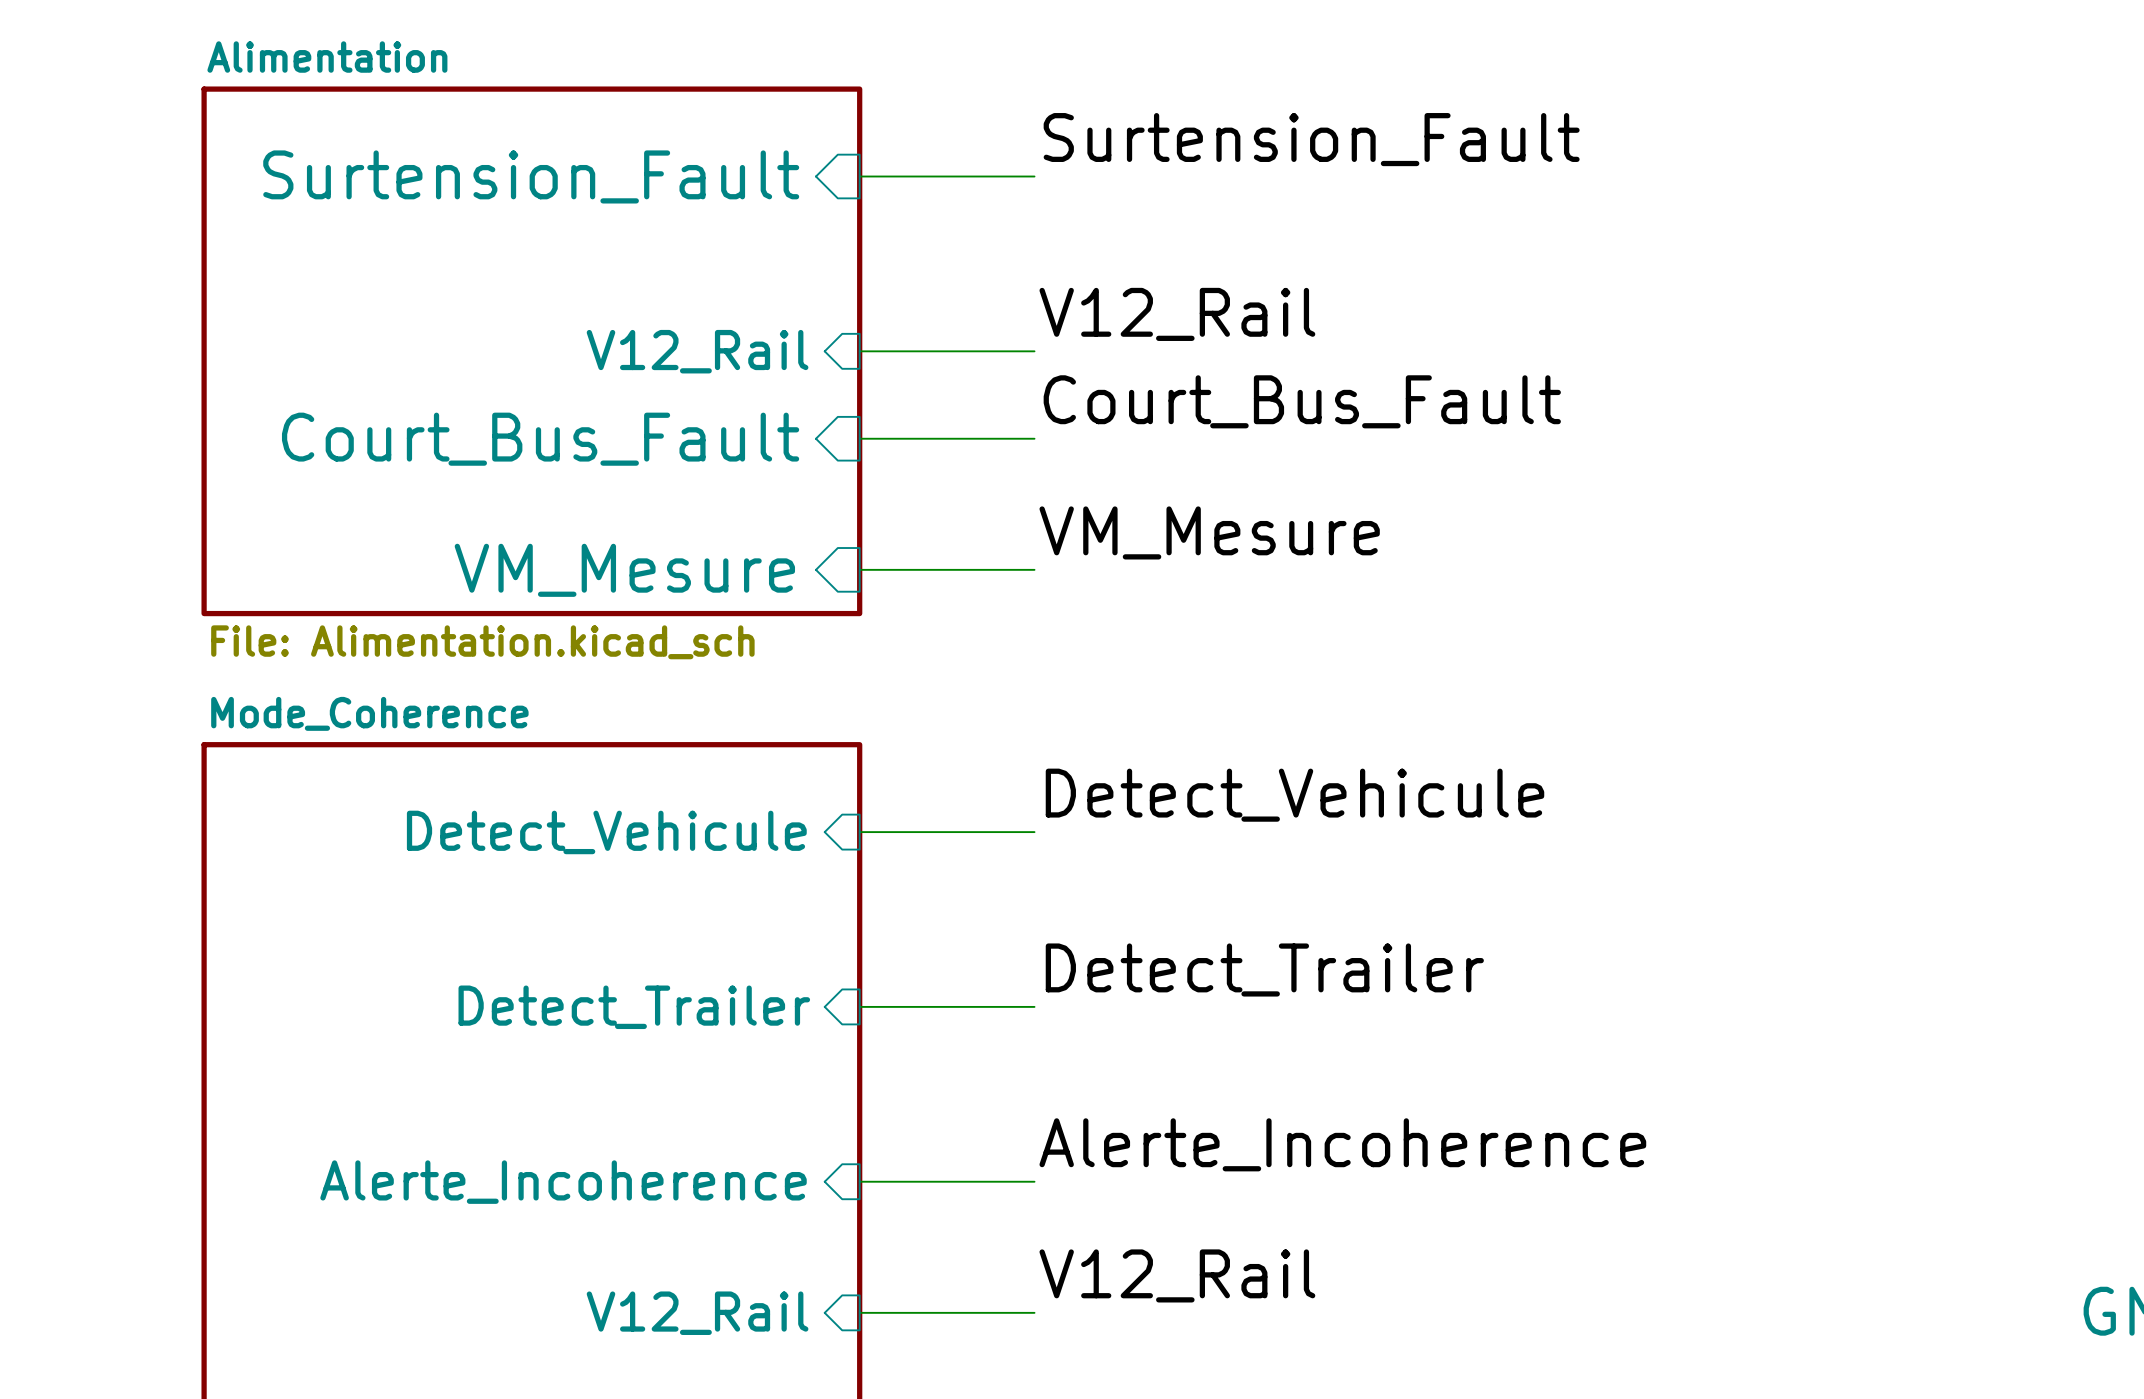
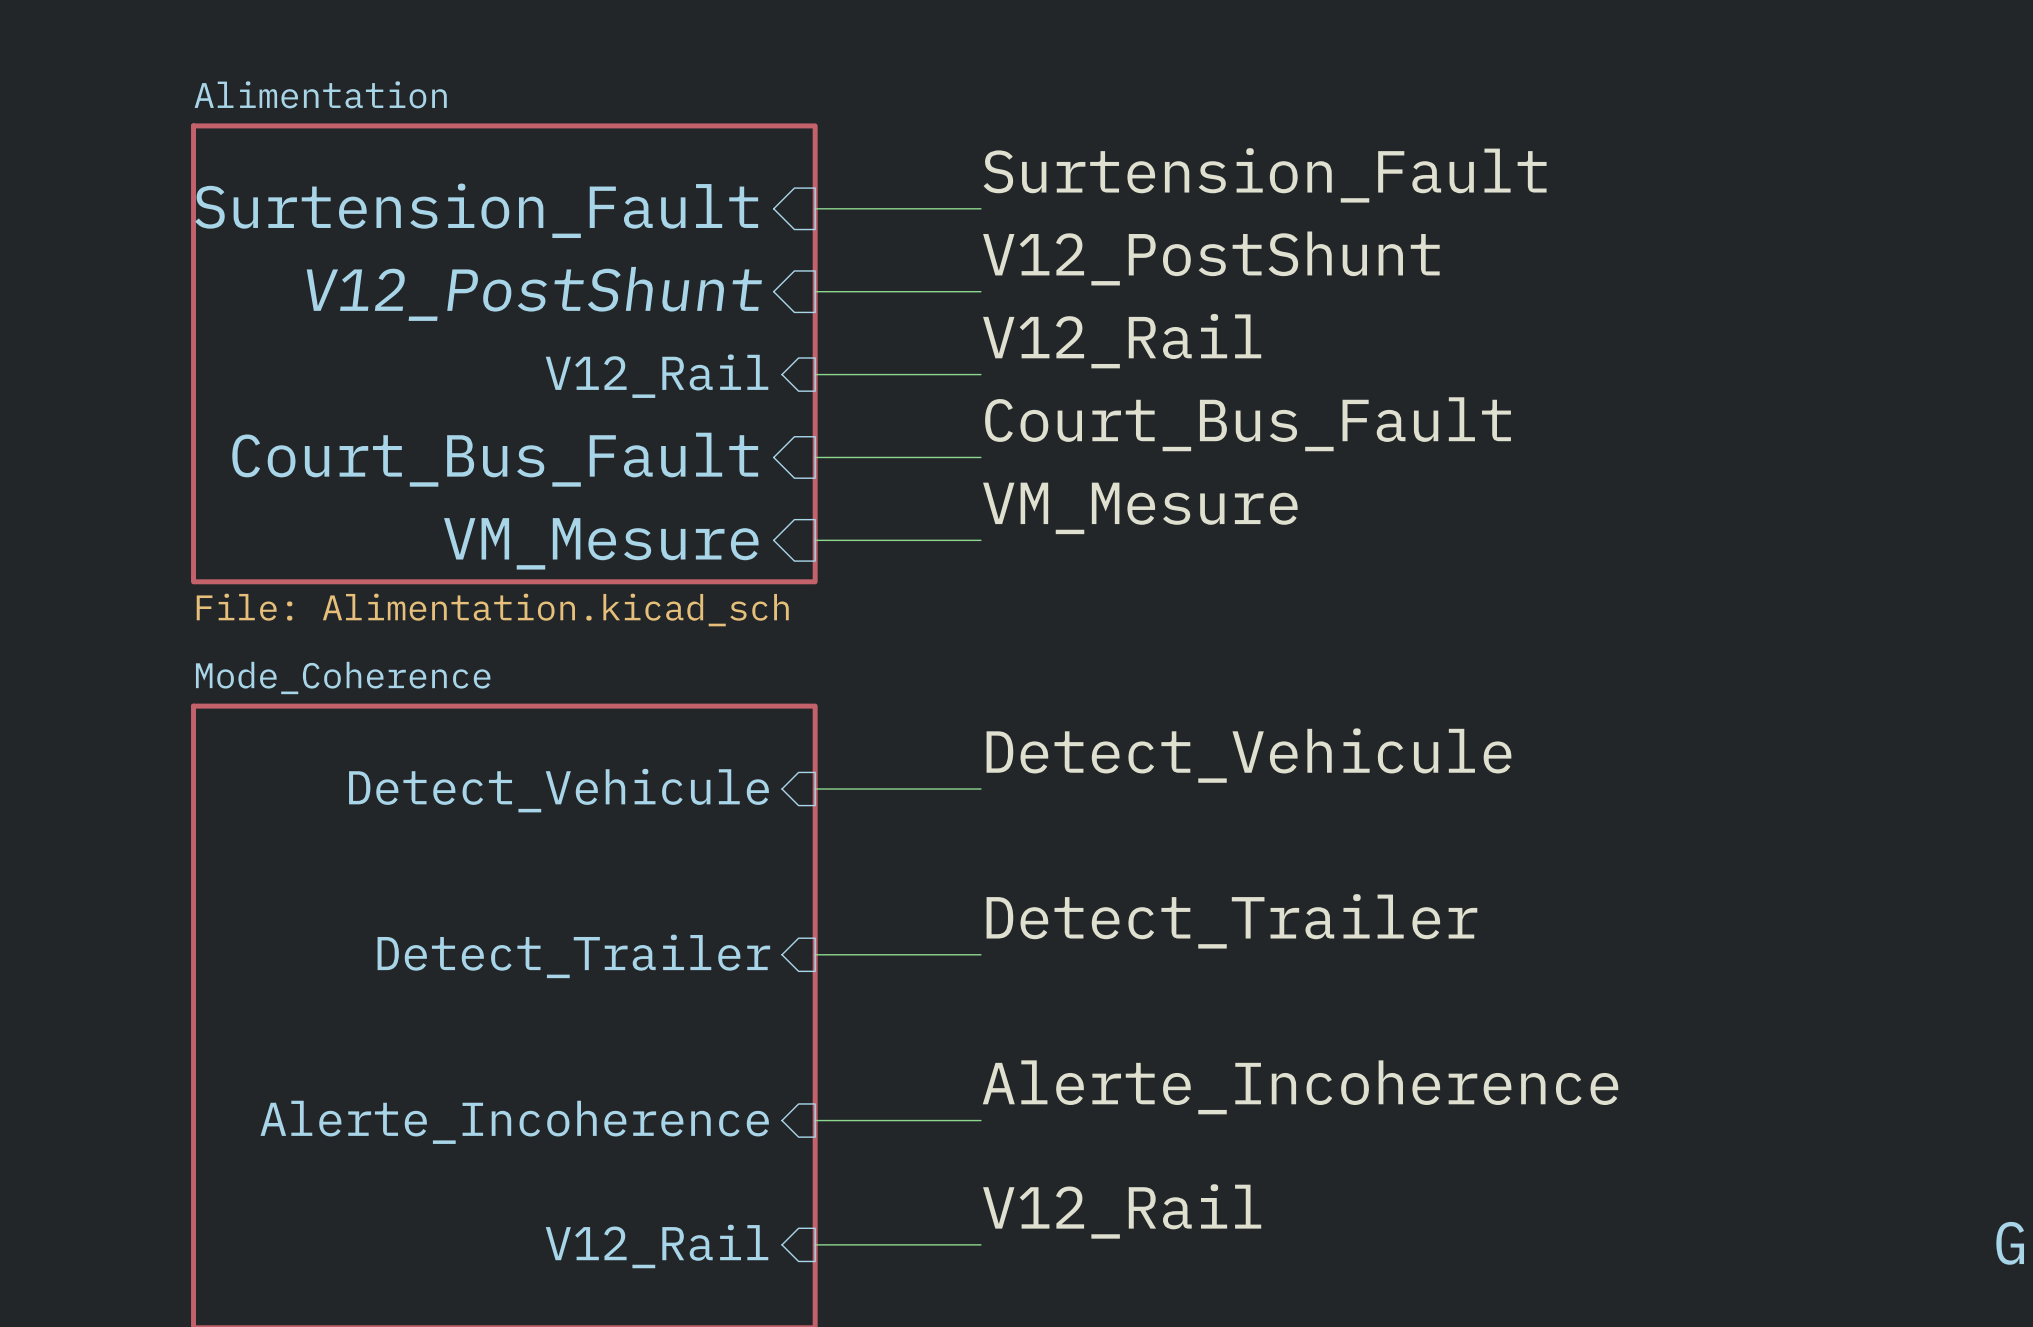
sheet Alimentation shape: [201, 86, 863, 617] -> [191, 123, 818, 585]
label position: Surtension_Fault (1311, 139) -> Surtension_Fault (1265, 175)
sheet pin position: Surtension_Fault (531, 176) -> Surtension_Fault (476, 210)
wire: (859, 176) (1034, 176) -> (815, 208) (980, 208)
label: none -> V12_PostShunt (1211, 258)
wire: none -> (815, 291) (980, 291)
sheet pin: none -> V12_PostShunt (534, 293)
label position: V12_Rail (1177, 314) -> V12_Rail (1122, 341)
sheet pin position: V12_Rail (697, 351) -> V12_Rail (657, 376)
wire: (859, 351) (1034, 351) -> (815, 374) (980, 374)
label position: Court_Bus_Fault (1302, 401) -> Court_Bus_Fault (1248, 424)
wire: (859, 438) (1034, 438) -> (815, 457) (980, 457)
sheet pin position: Court_Bus_Fault (540, 439) -> Court_Bus_Fault (495, 459)

